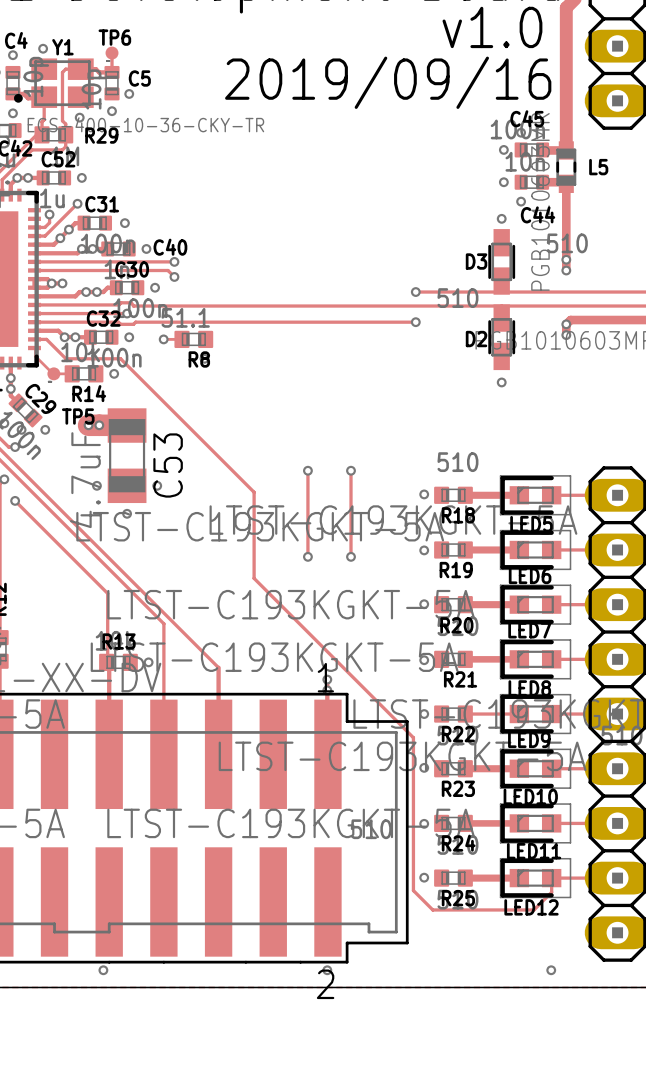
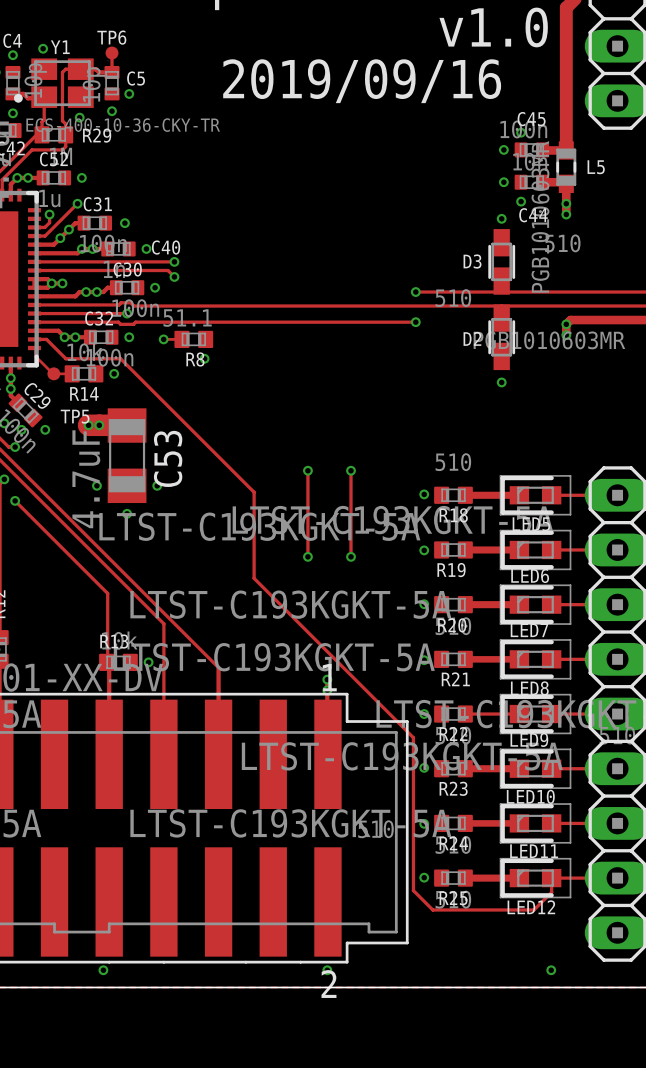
via: none -> (566, 203)
track: (566, 214) (566, 270) -> none
via: none -> (566, 214)
via: (566, 259) -> none
via: (566, 270) -> none

